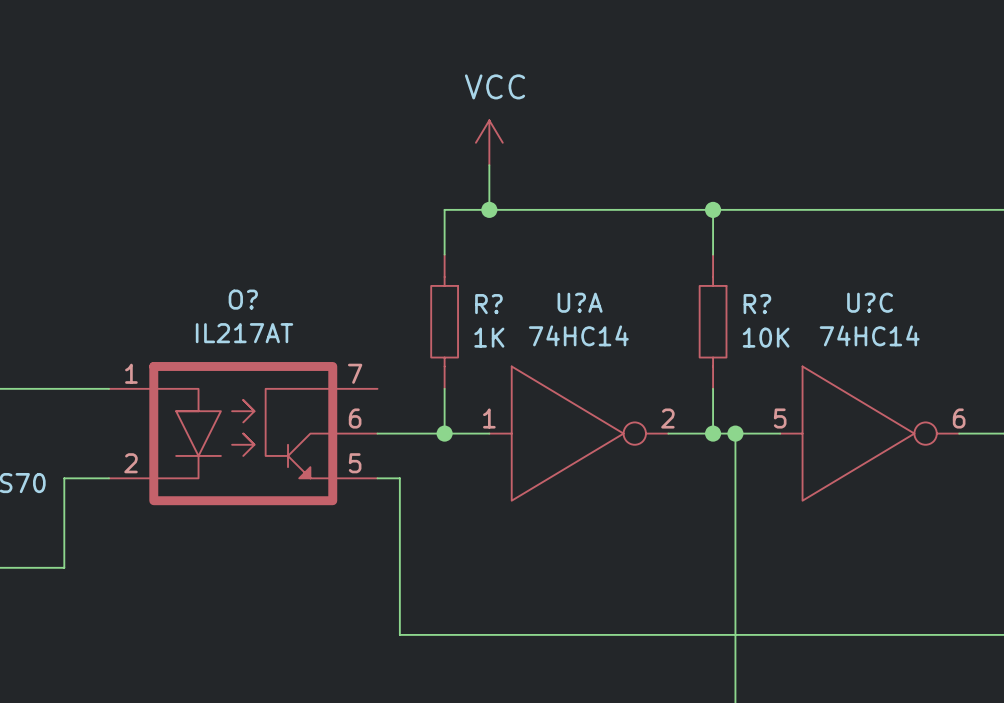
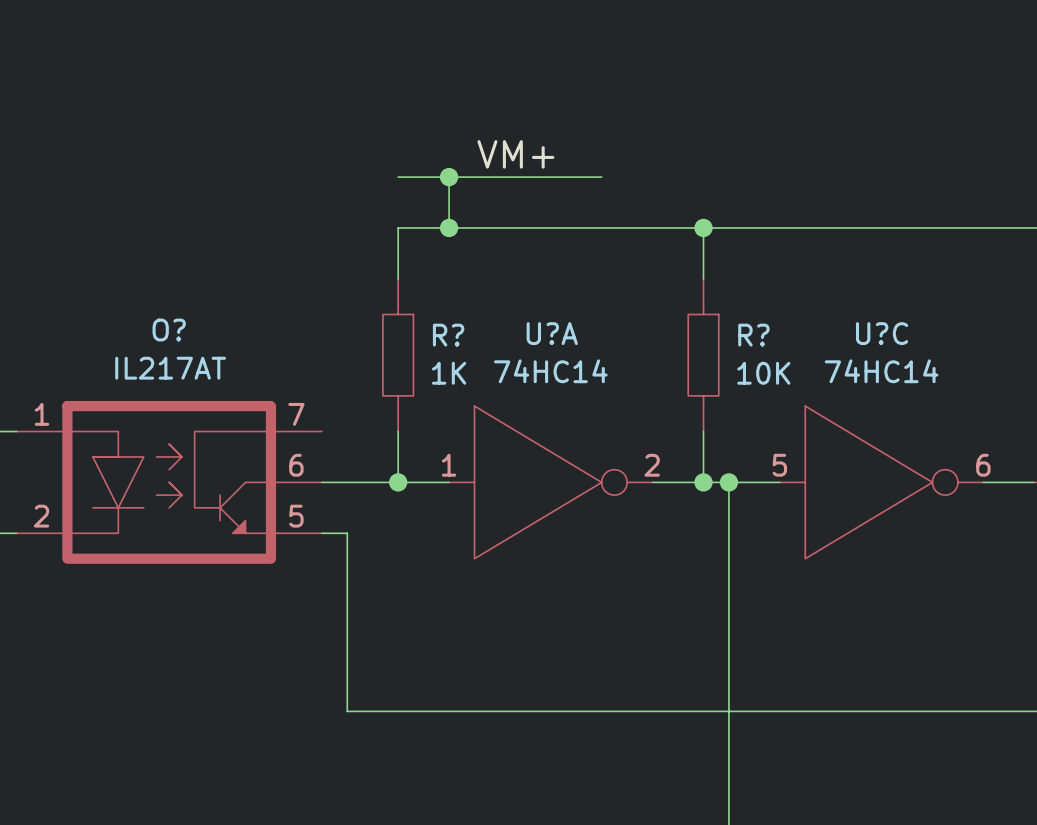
power symbol: VCC (489, 142) -> none
label: none -> VM+ (515, 154)
wire: none -> (398, 177) (601, 177)
junction: none -> (449, 177)

